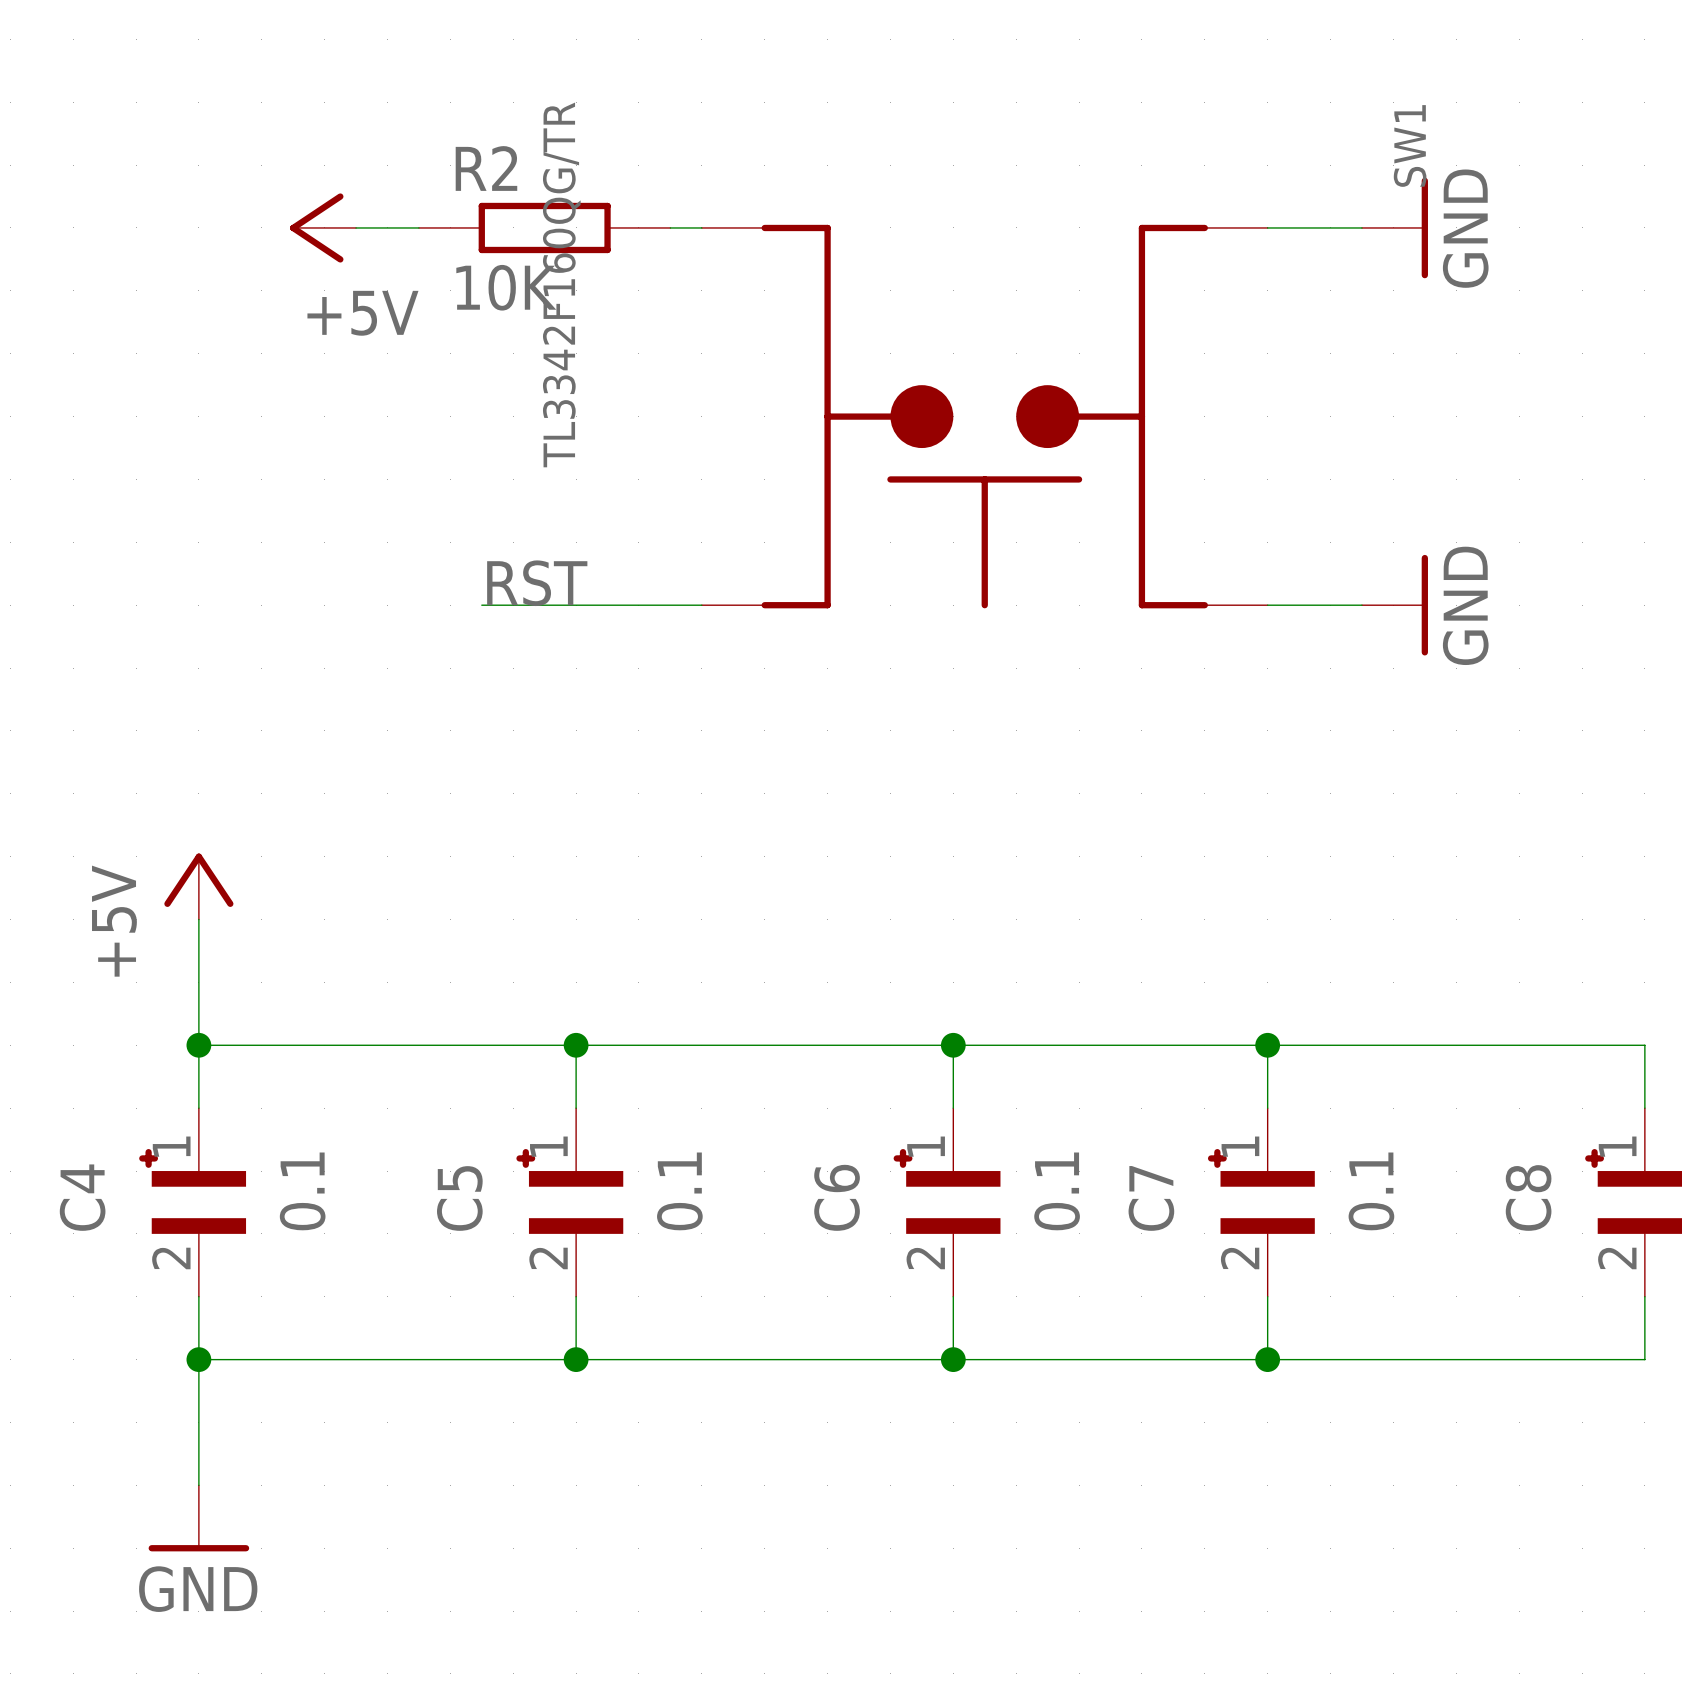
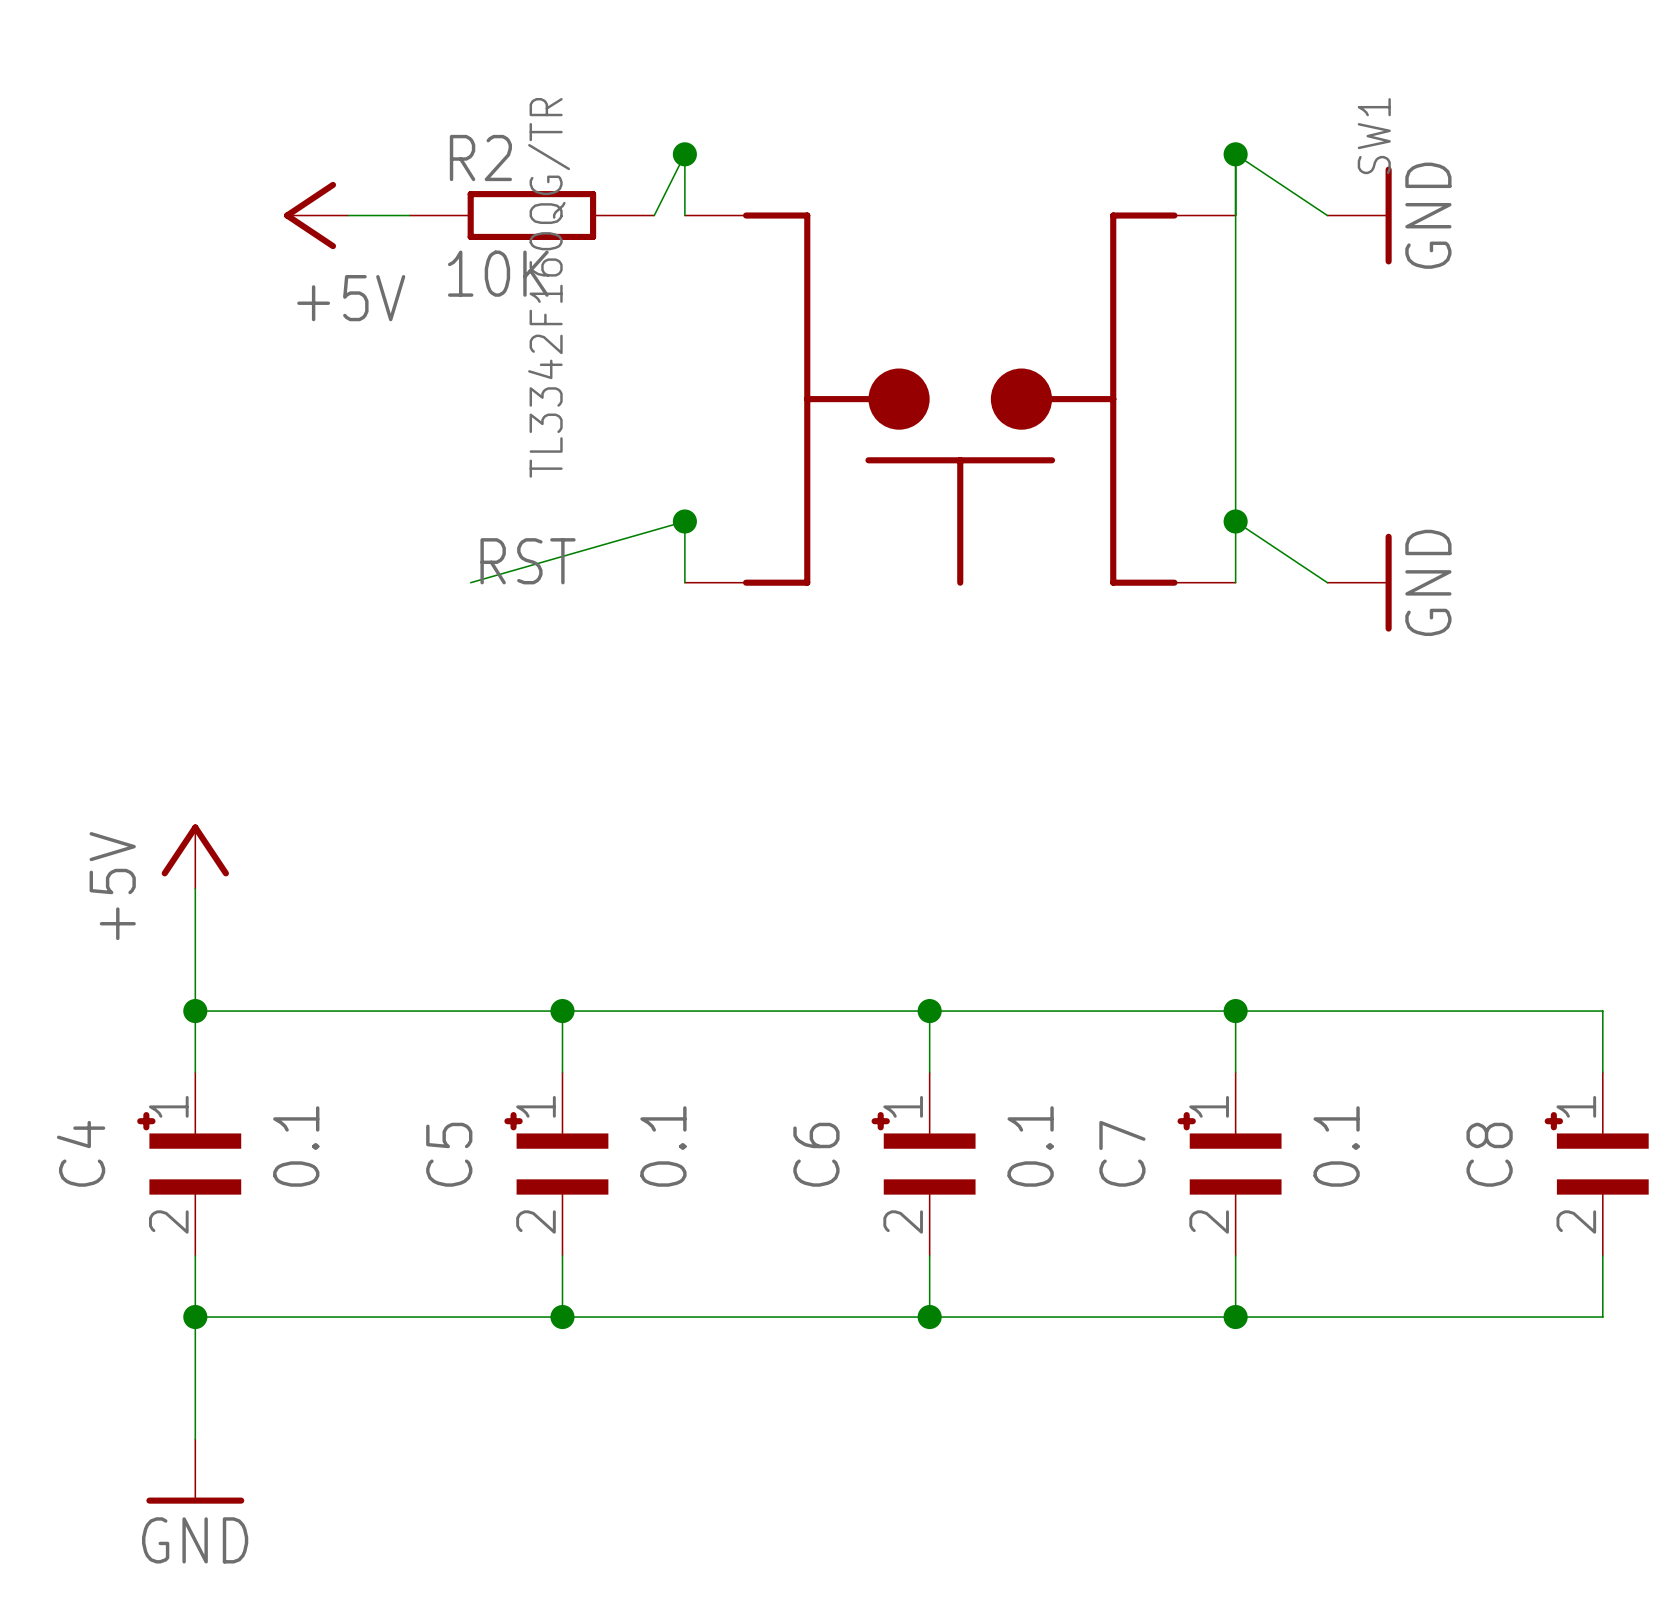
junction: none -> (684, 154)
junction: none -> (1235, 154)
wire: (670, 227) (701, 227) -> (654, 215) (684, 154) (684, 215)
wire: (1267, 227) (1361, 227) -> (1235, 582) (1235, 154) (1327, 215)
junction: none -> (684, 521)
junction: none -> (1235, 521)
wire: (481, 605) (701, 605) -> (470, 582) (684, 521) (684, 582)
wire: (1267, 605) (1361, 605) -> (1235, 521) (1327, 582)

